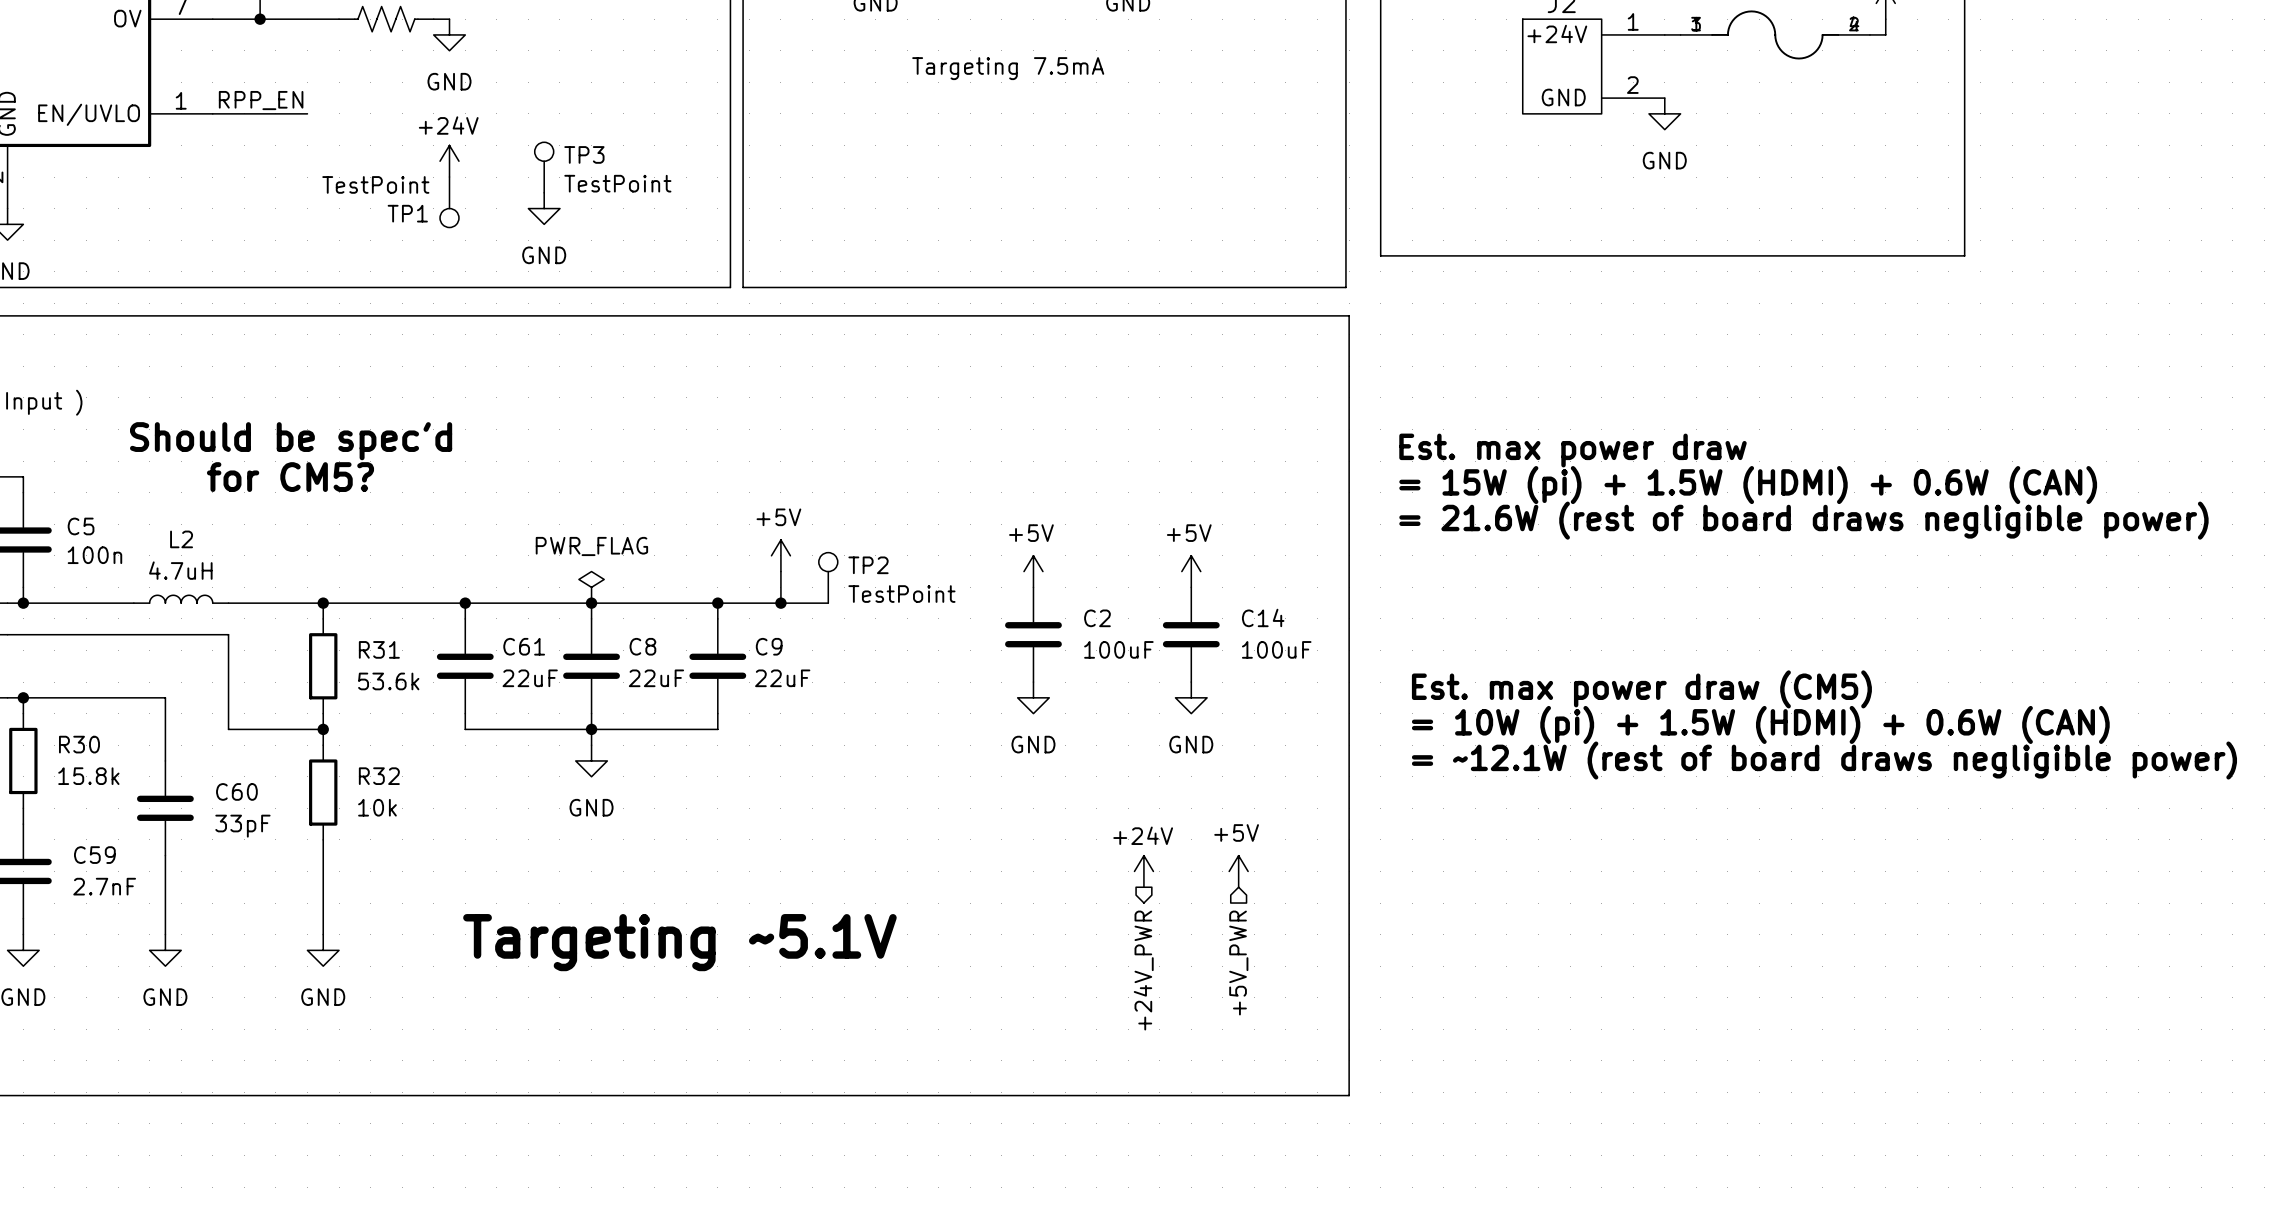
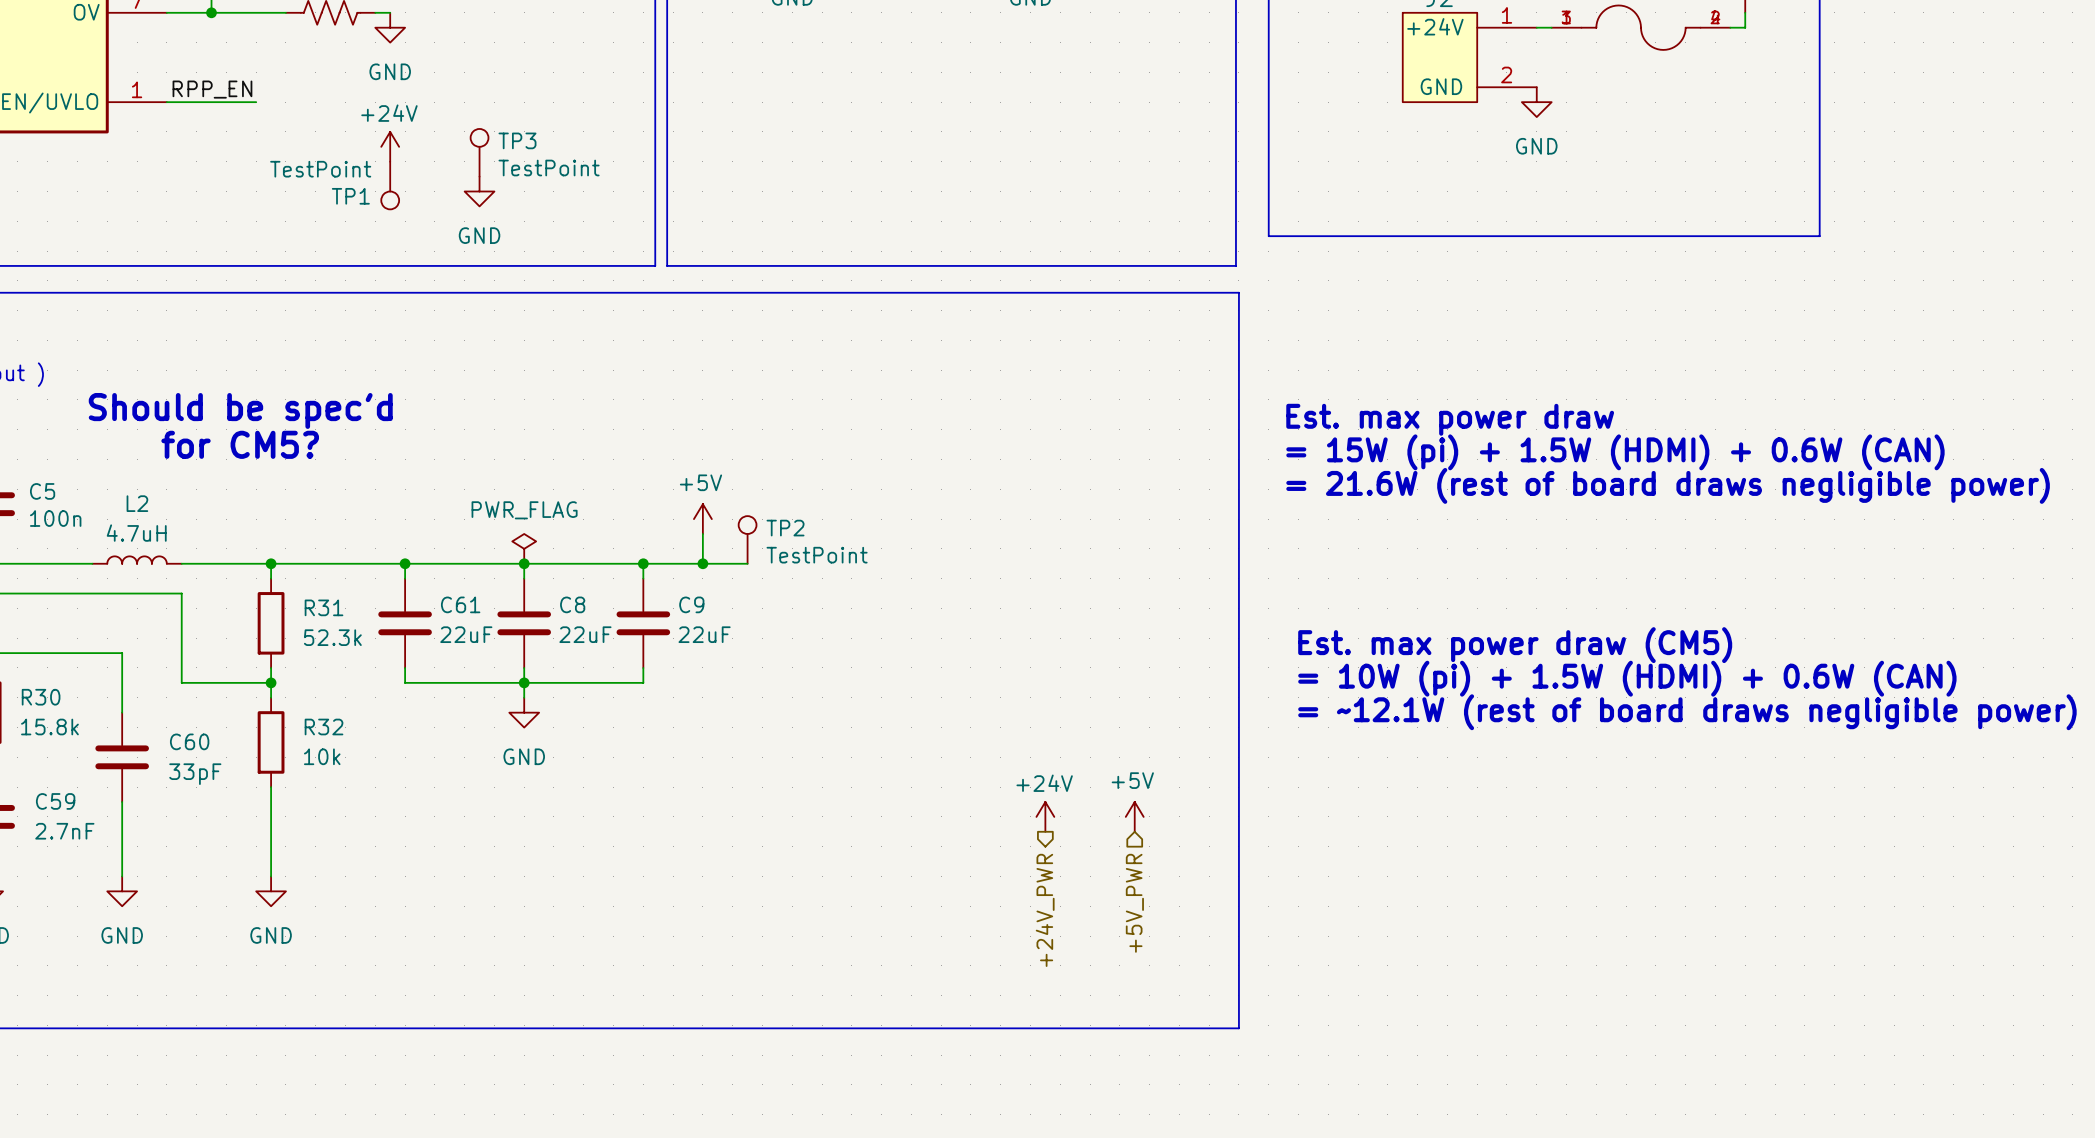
text: Targeting 7.5mA (1008, 68) -> none
power symbol: +5V (1033, 571) -> none
power symbol: +5V (1191, 571) -> none
C2: 100uF (1033, 634) -> none
C14: 100uF (1191, 634) -> none
R31 value: 53.6k (388, 681) -> 52.3k (332, 637)
power symbol: GND (1033, 697) -> none
power symbol: GND (1191, 697) -> none
text: Targeting ~5.1V (679, 942) -> none

